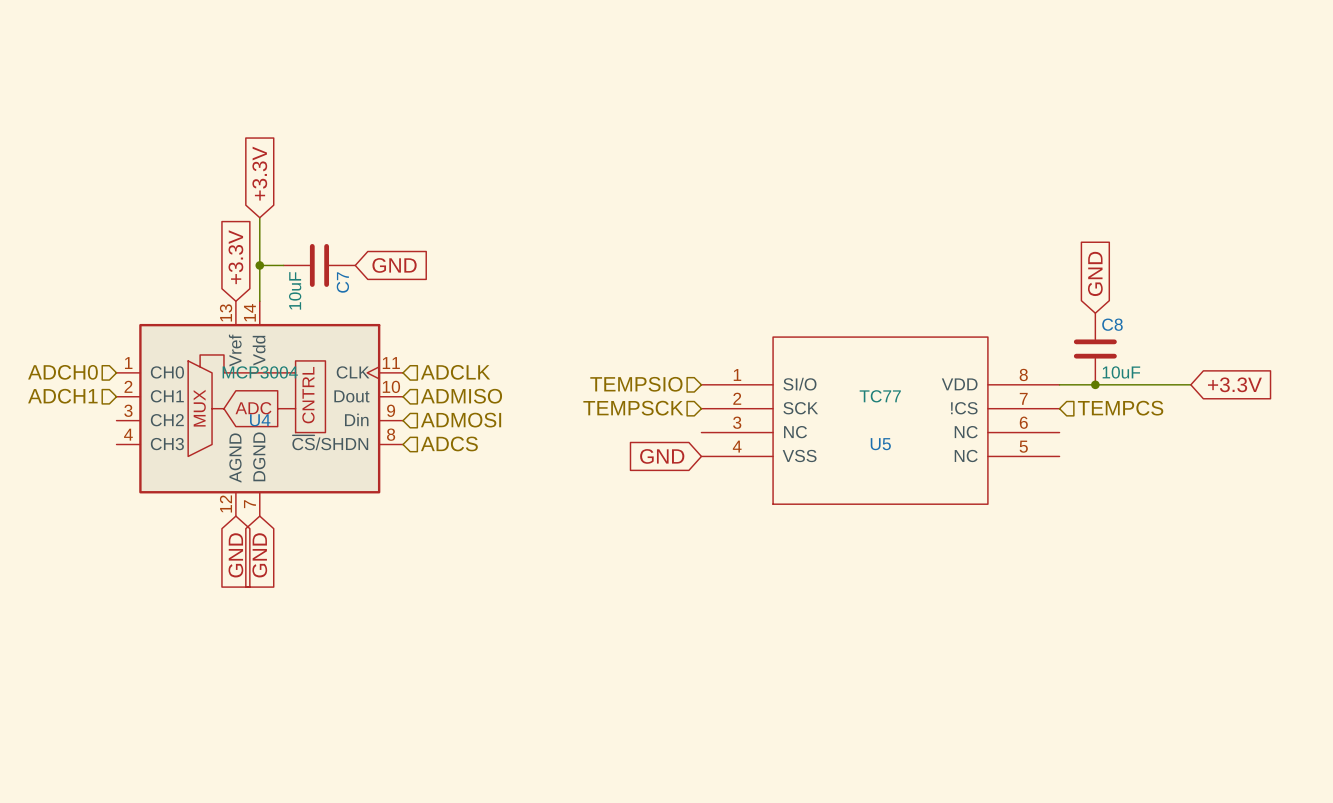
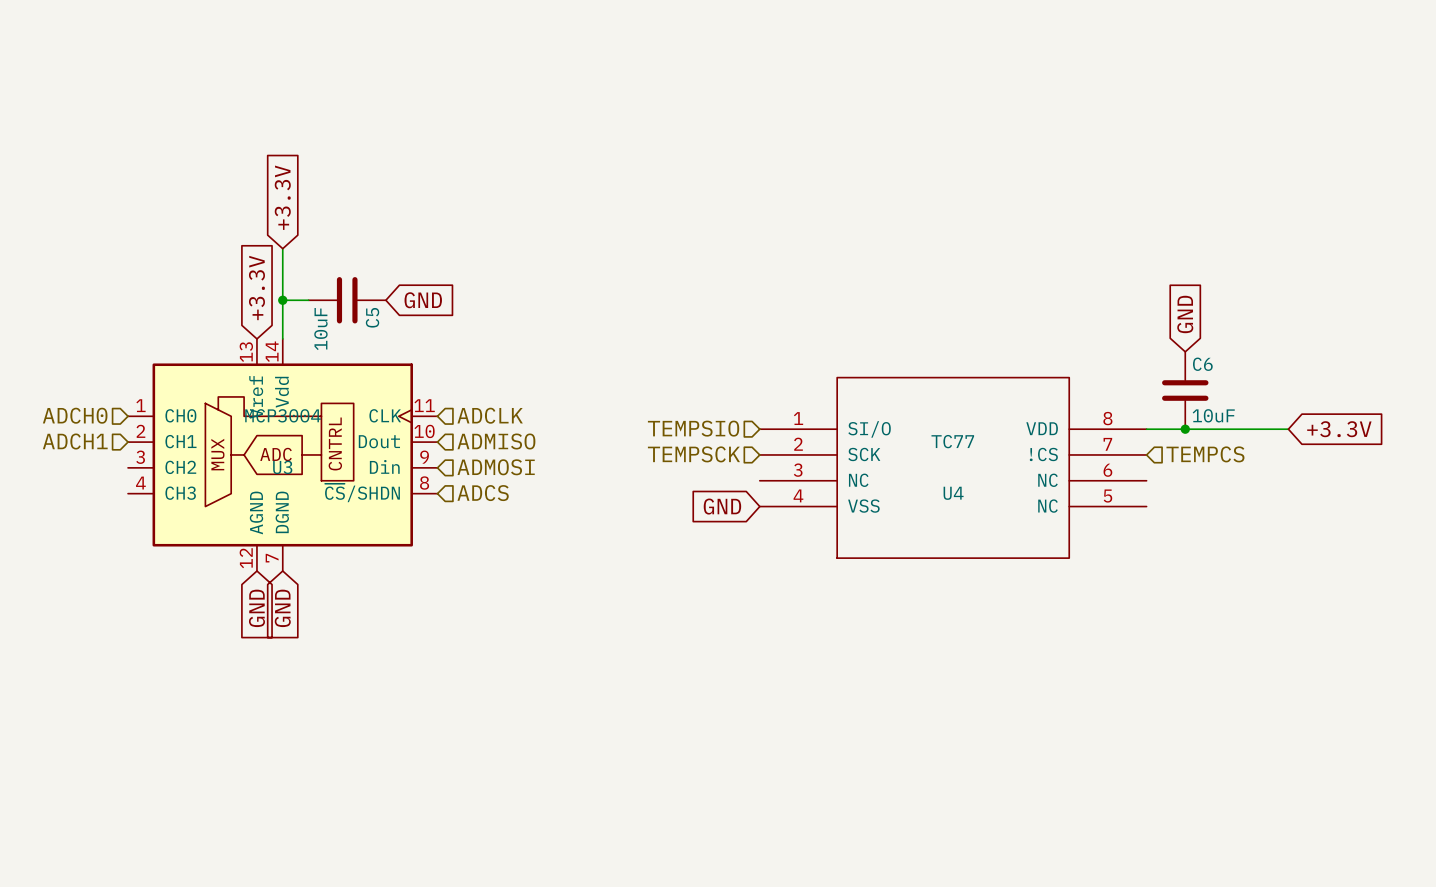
C7 name: C7 (342, 282) -> C5 (372, 317)
C8 name: C8 (1112, 324) -> C6 (1202, 364)
U4 name: U4 (260, 420) -> U3 (282, 467)
U5 name: U5 (880, 444) -> U4 (953, 493)

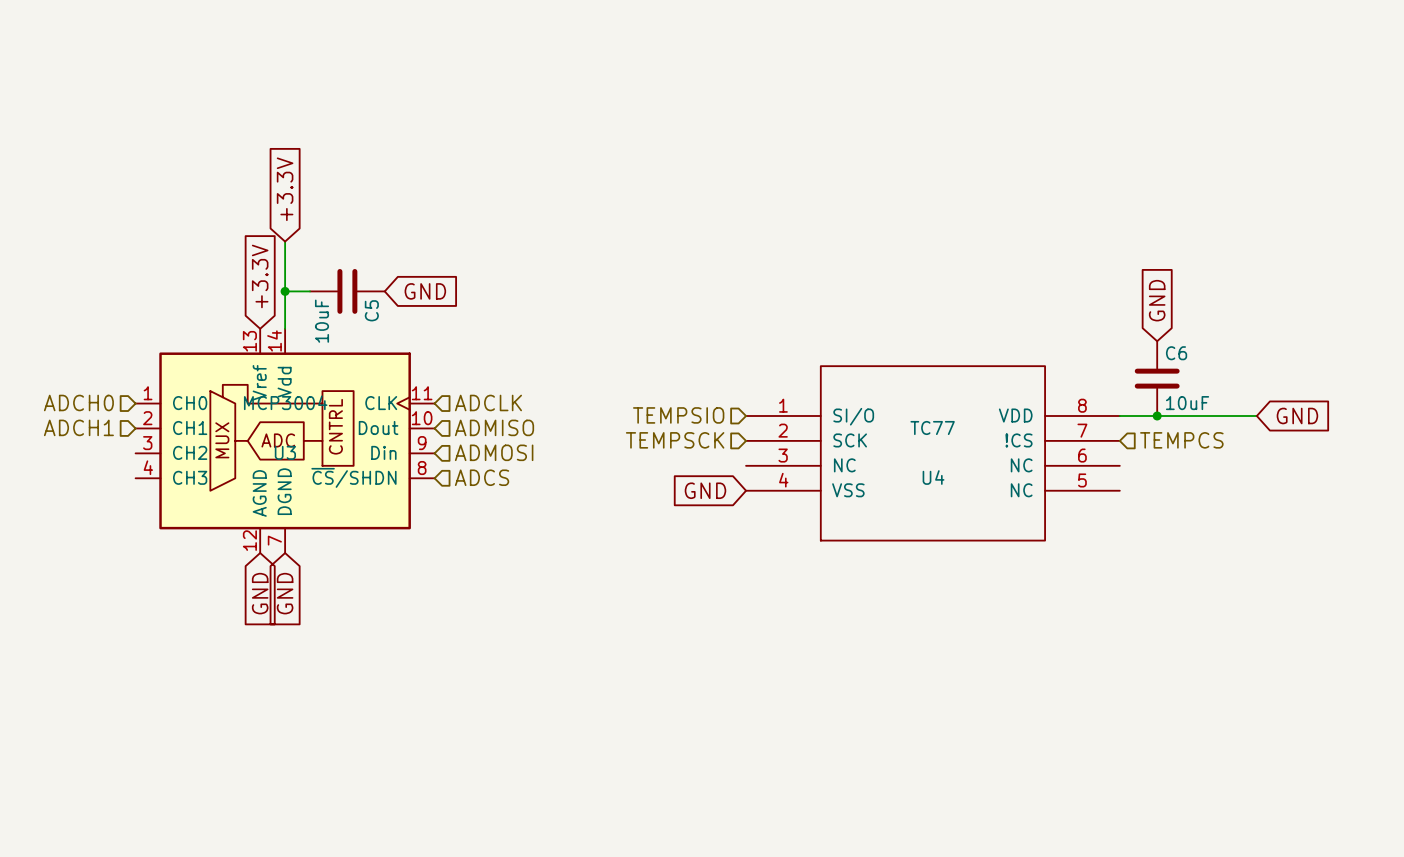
global label: +3.3V (1339, 429) -> GND (1297, 416)

